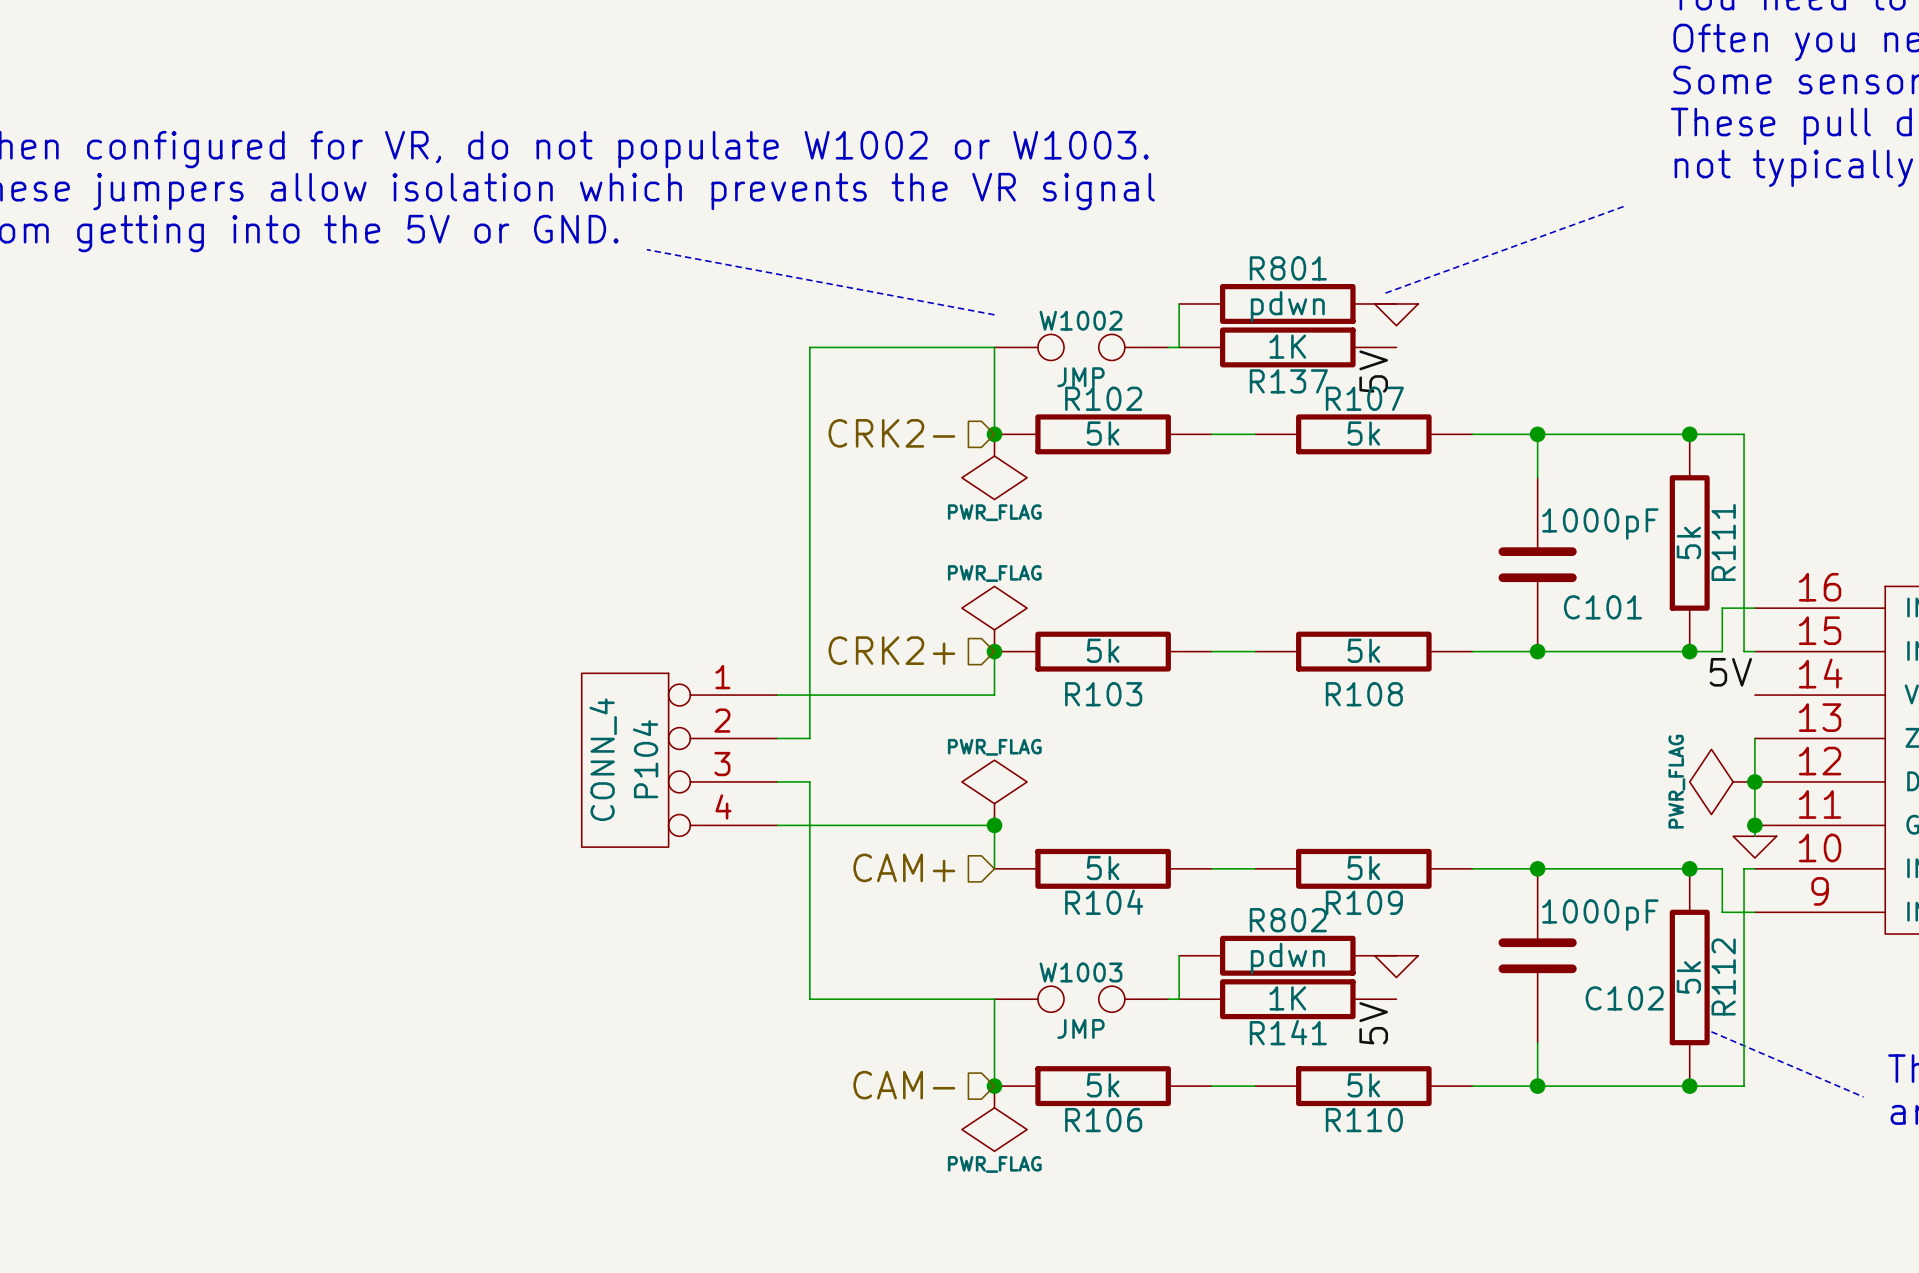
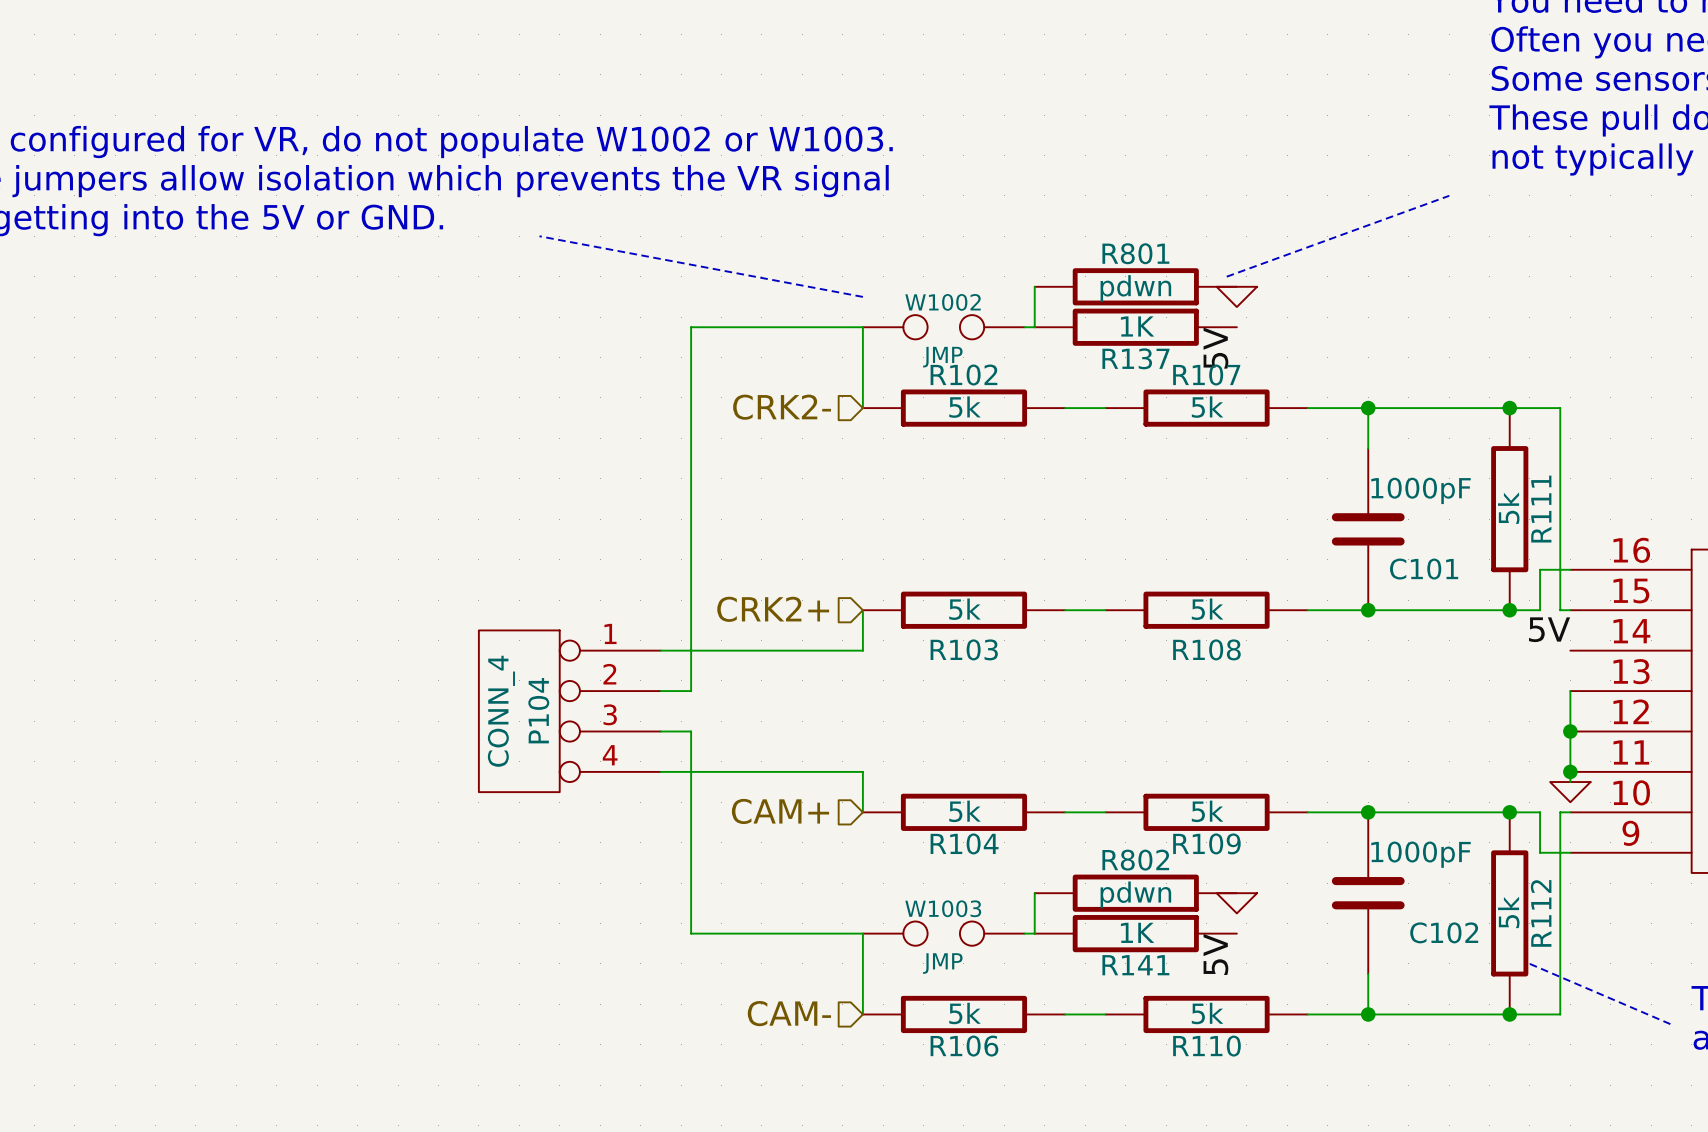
junction: (994, 434) -> none
power symbol: PWR_FLAG (994, 466) -> none
power symbol: PWR_FLAG (994, 619) -> none
junction: (994, 651) -> none
power symbol: PWR_FLAG (1722, 781) -> none
power symbol: PWR_FLAG (994, 792) -> none
junction: (994, 825) -> none
junction: (994, 1086) -> none
power symbol: PWR_FLAG (994, 1118) -> none

